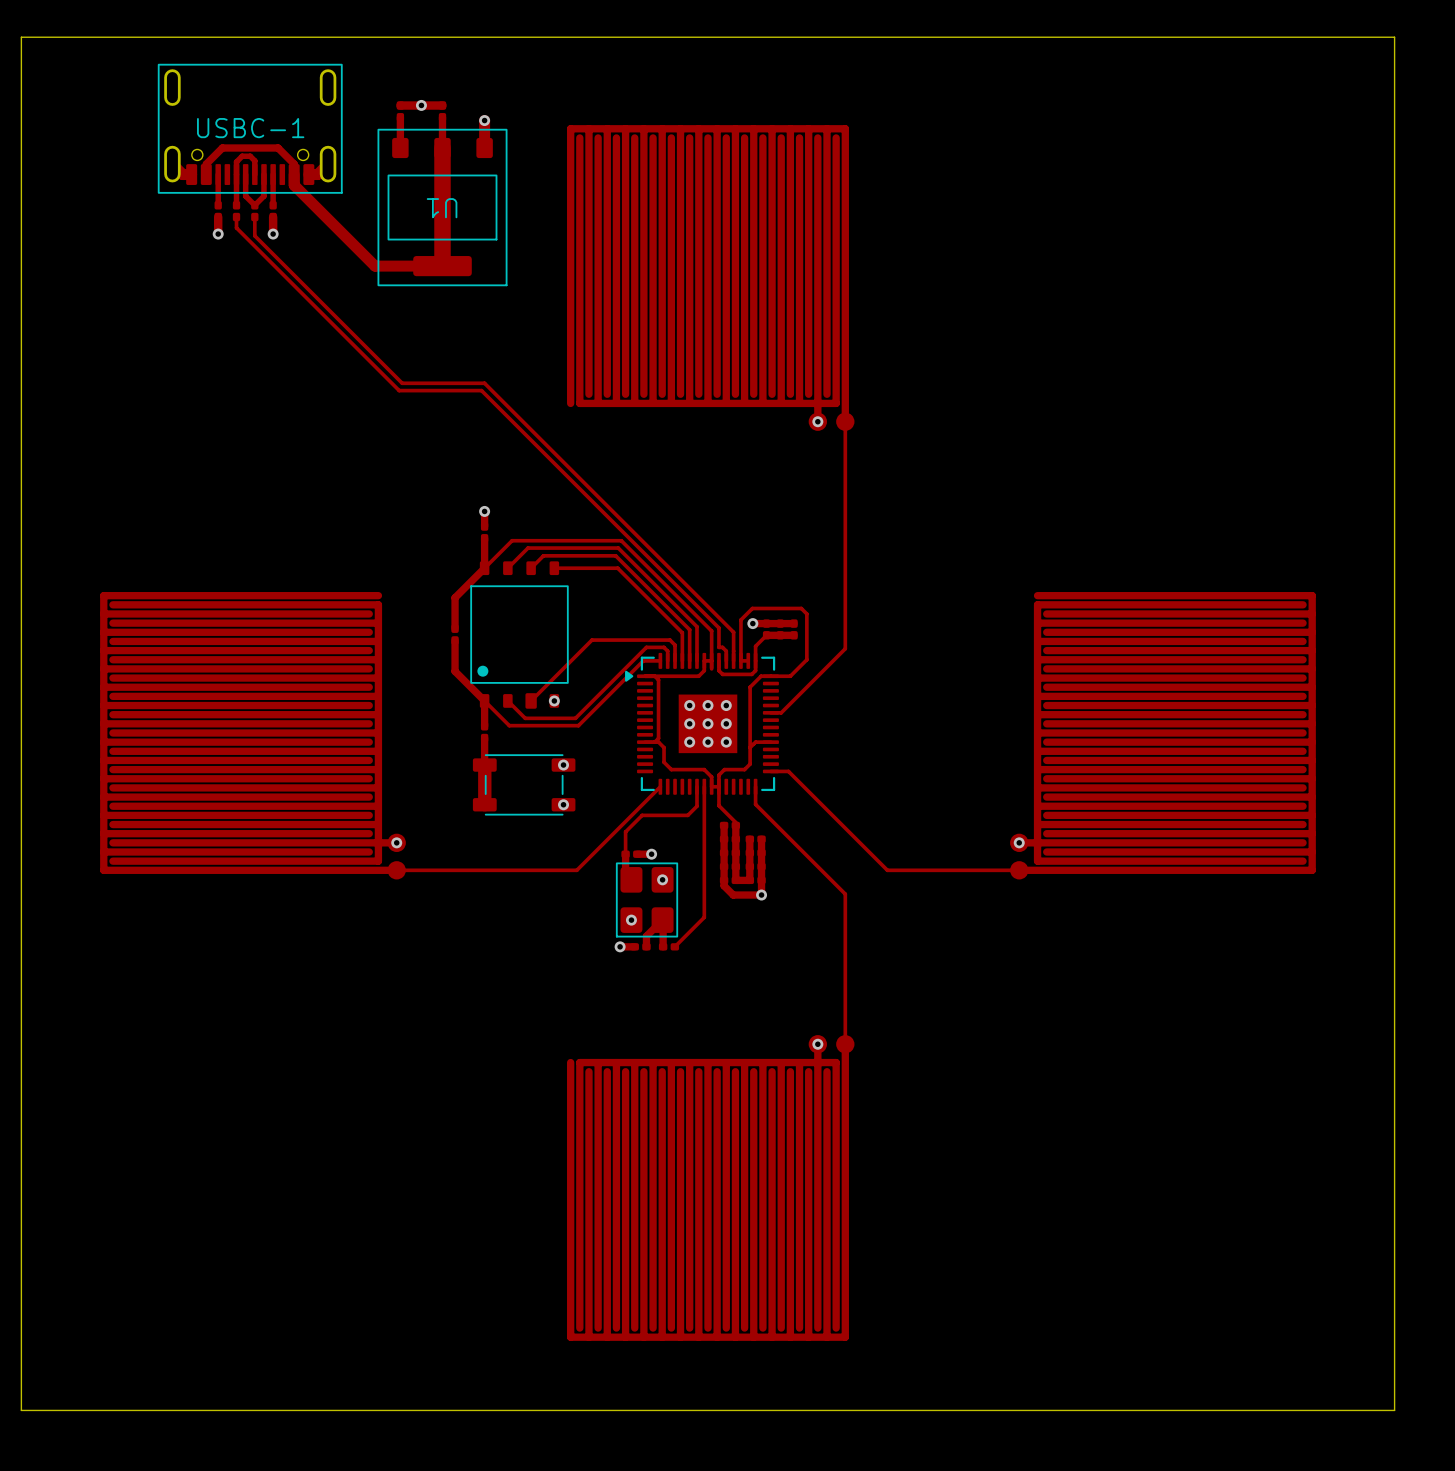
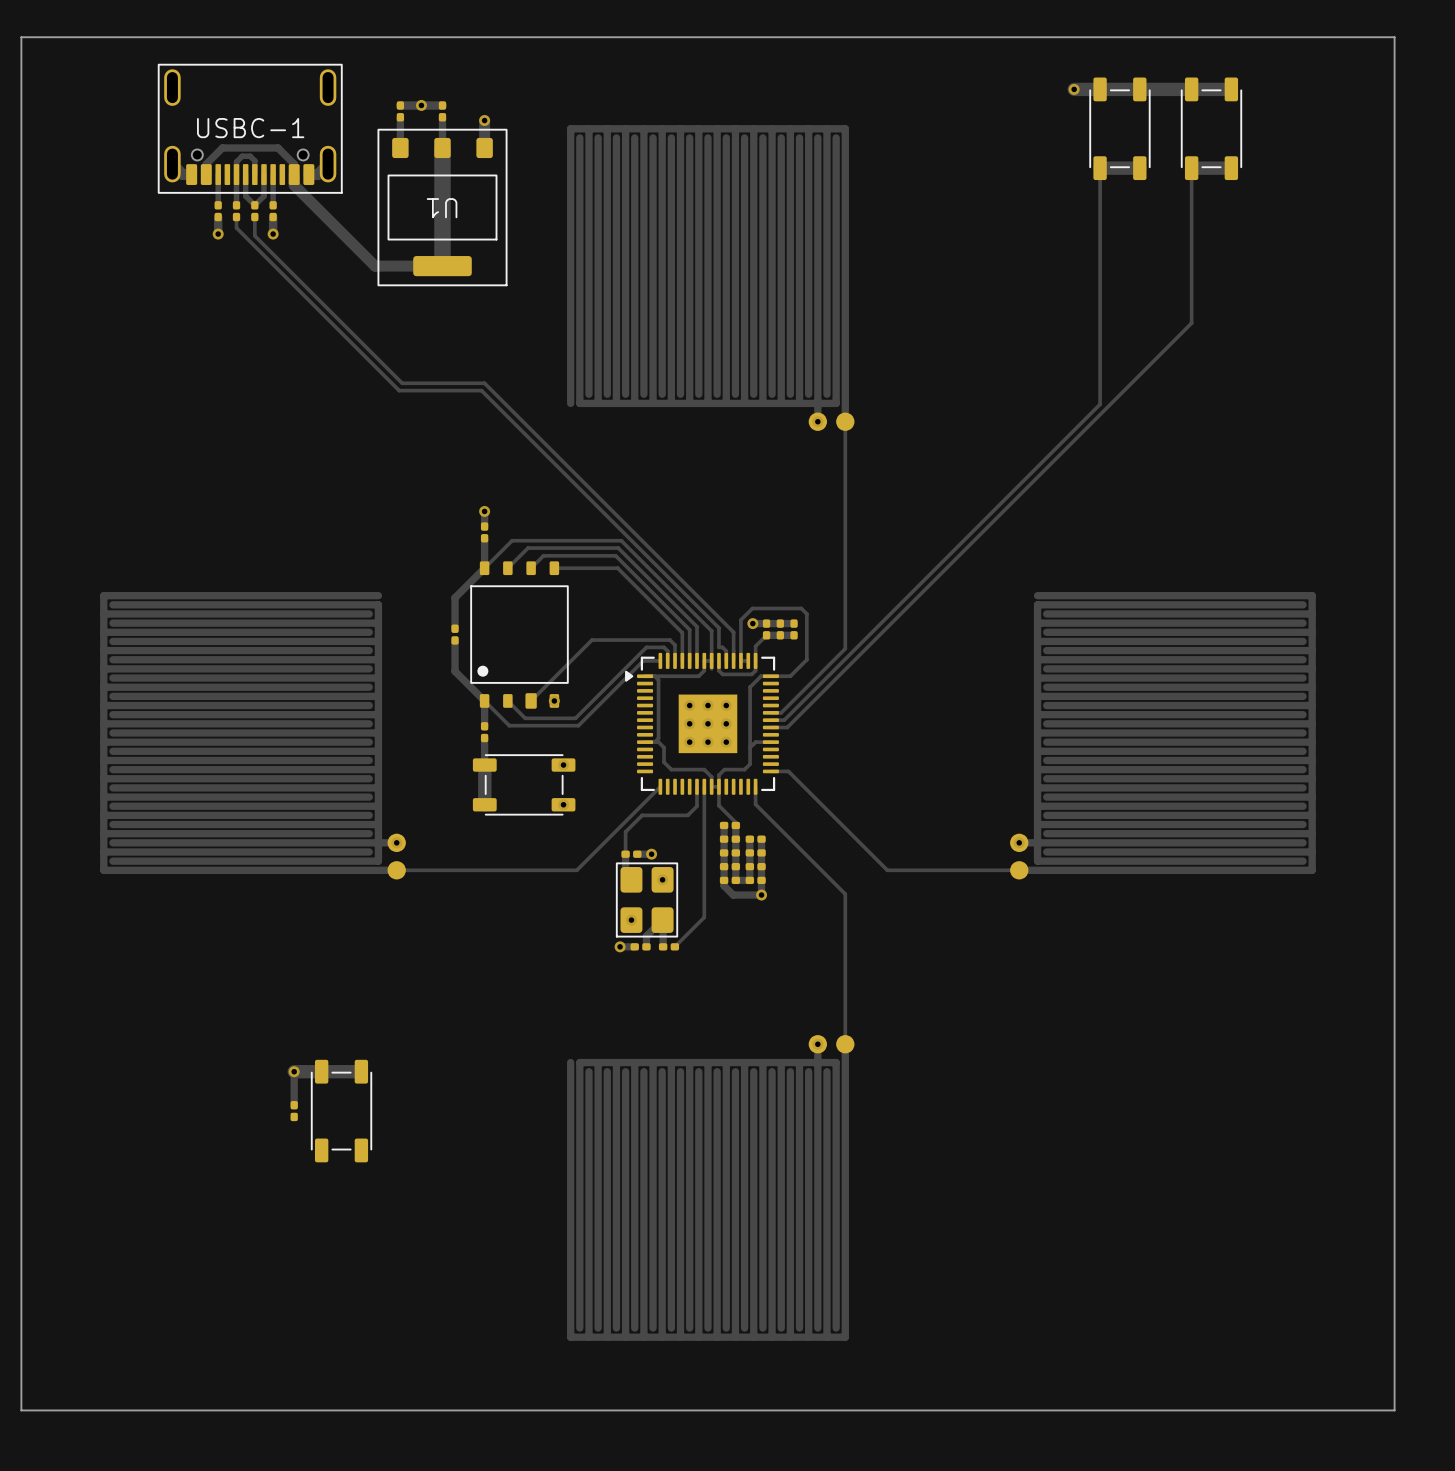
track: none -> (1074, 89) (1231, 89)
via: none -> (1074, 89)
part: none -> (1119, 128)
part: none -> (1211, 128)
track: none -> (1139, 168) (1100, 168) (1100, 404) (784, 720) (770, 720)
track: none -> (1231, 168) (1191, 168) (1191, 323) (787, 727) (770, 727)
via: none -> (294, 1071)
track: none -> (361, 1071) (294, 1071) (294, 1105)
part: none -> (294, 1111)
part: none -> (341, 1111)

